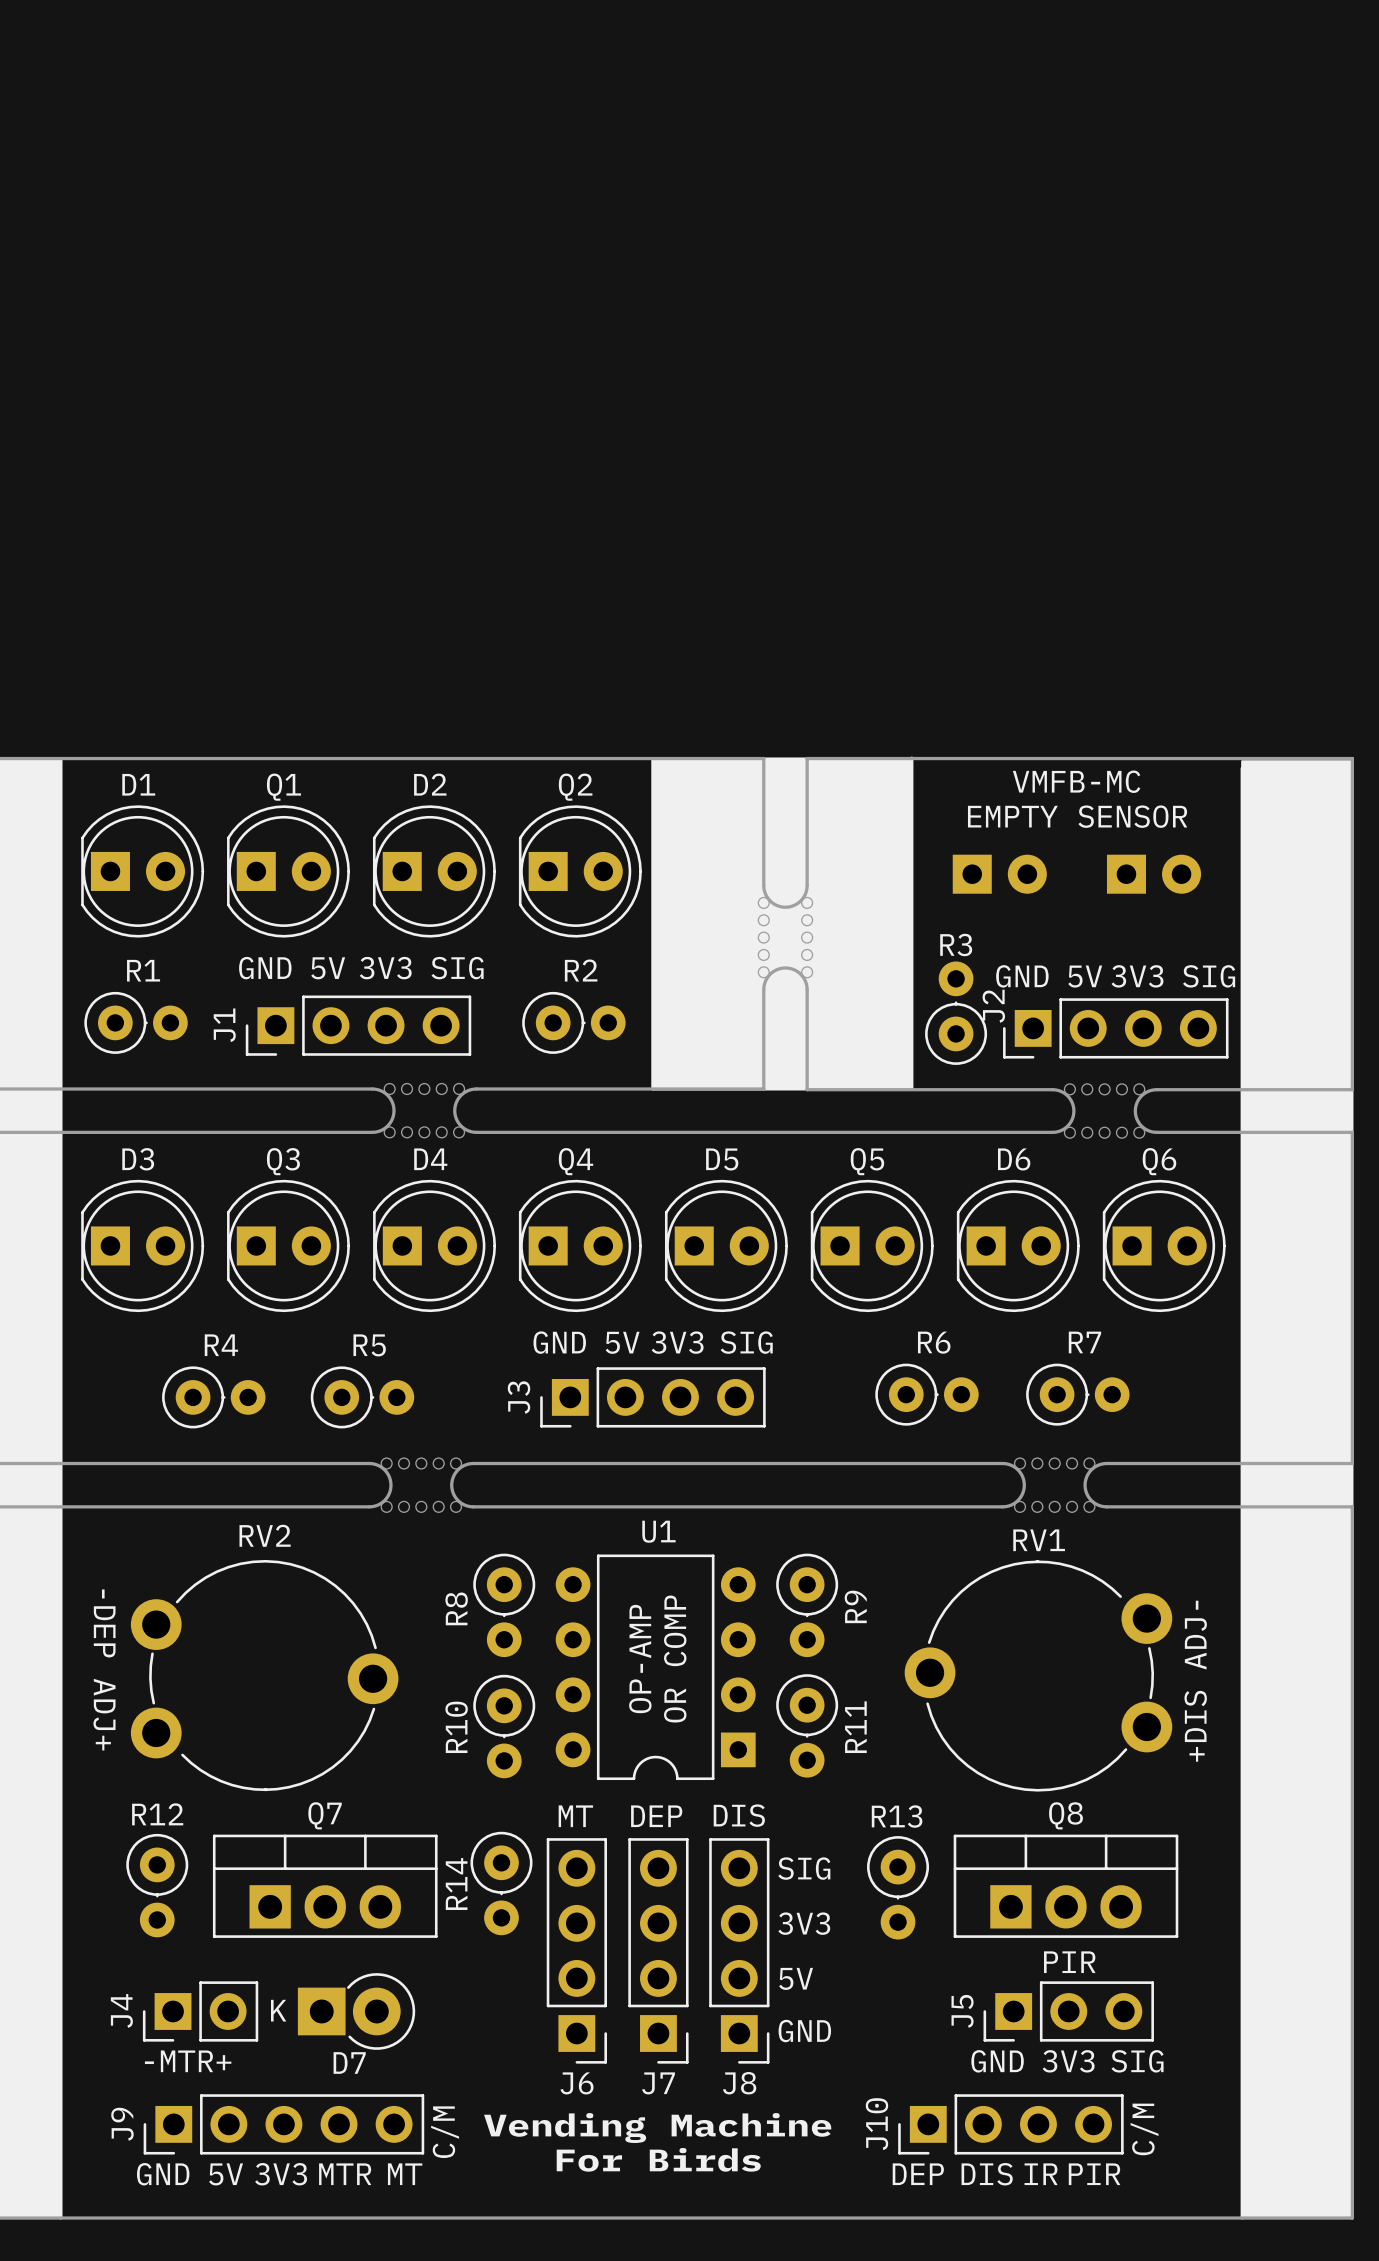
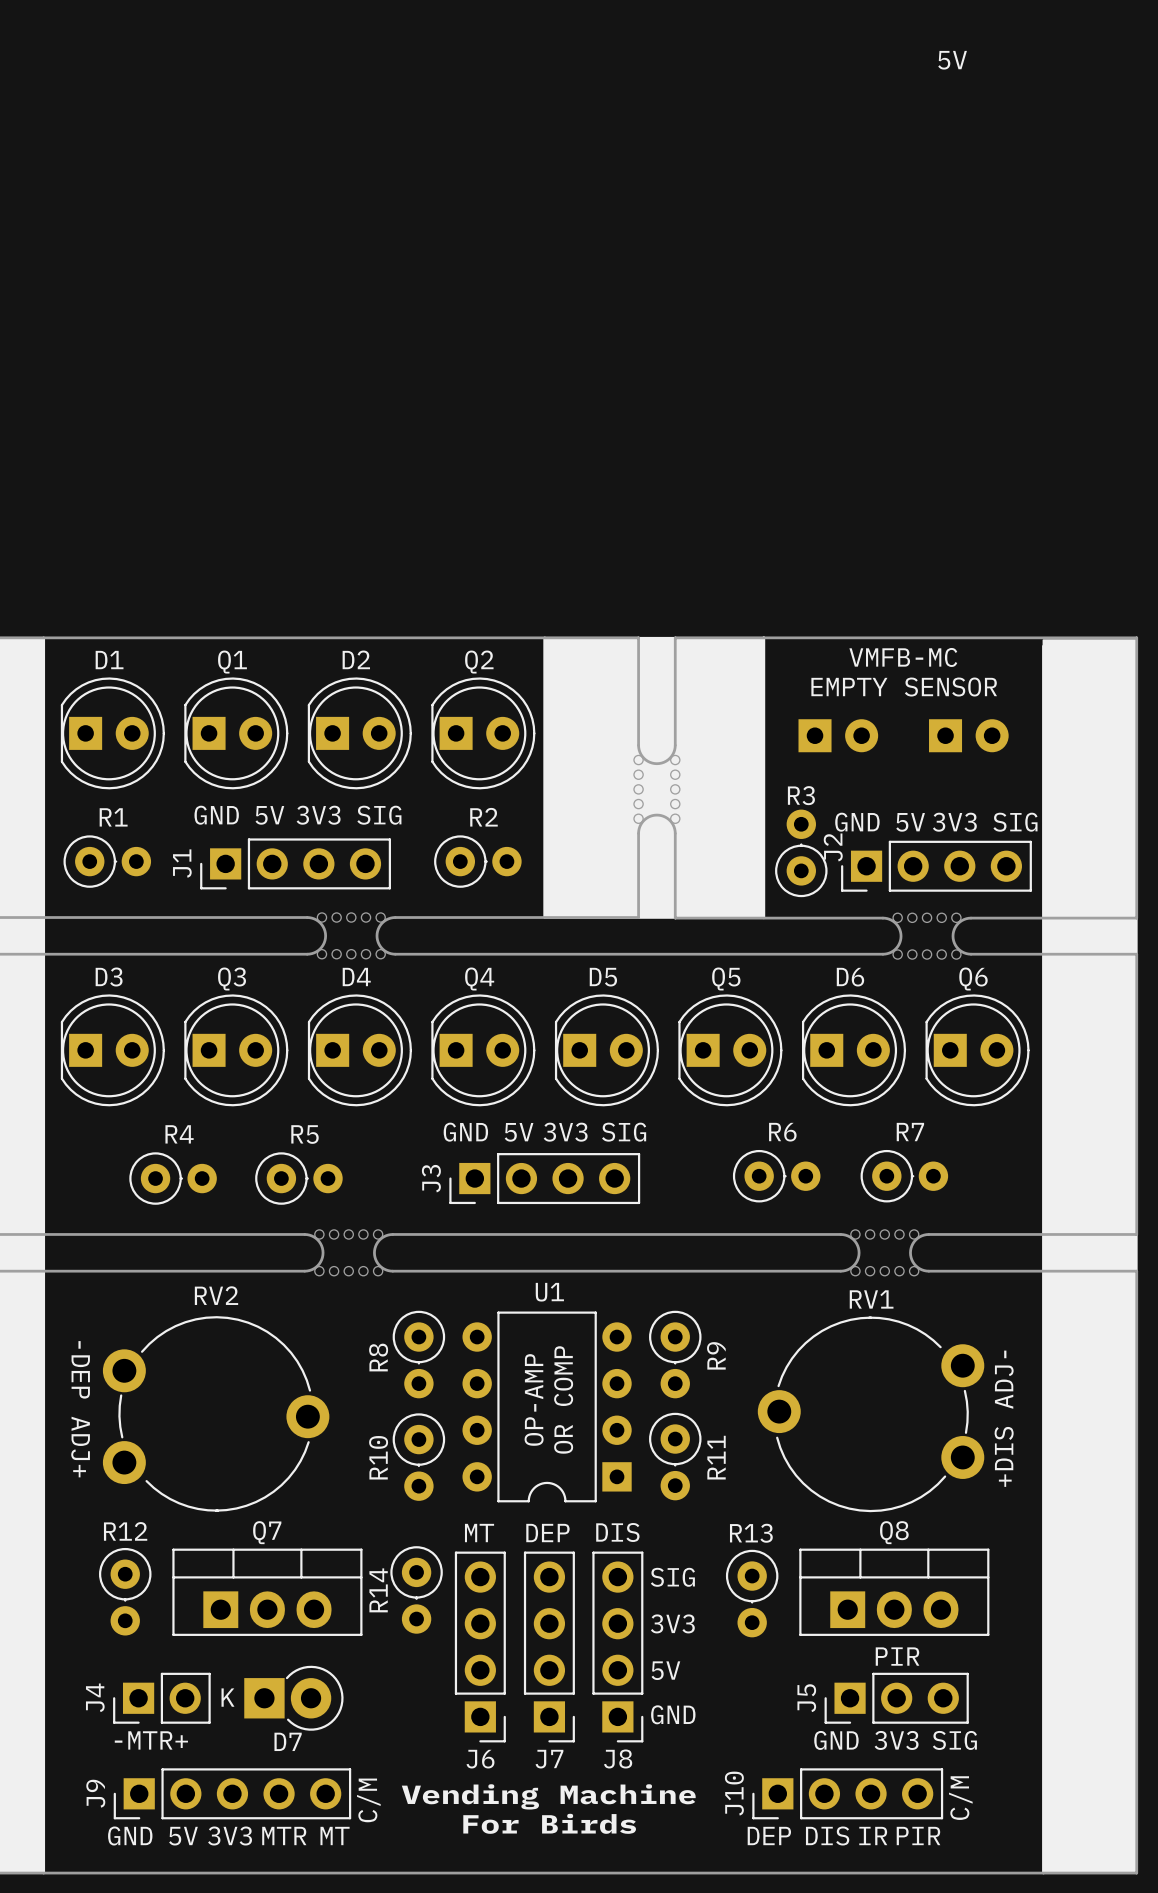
text: none -> 5V (952, 60)

